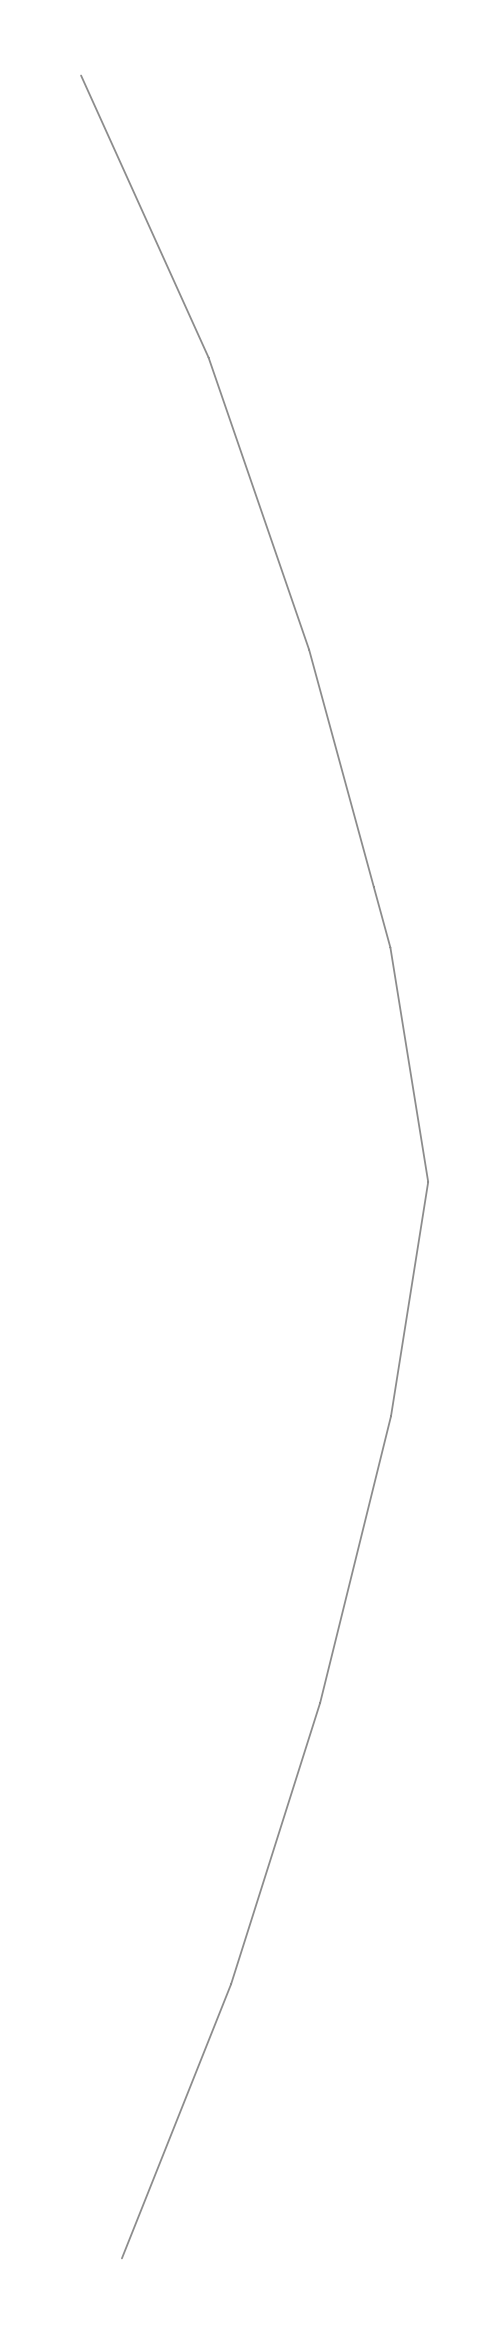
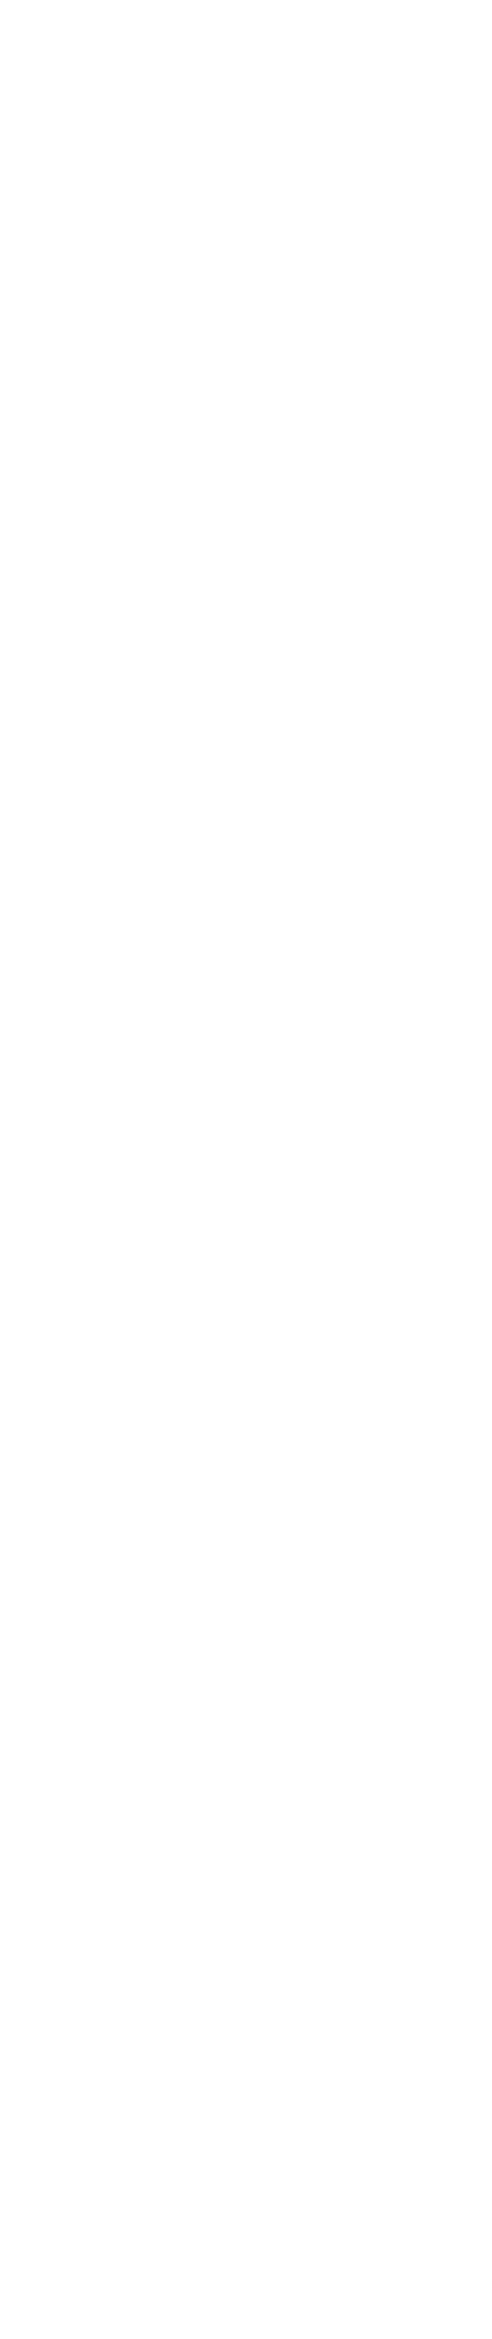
line: (81, 75) (208, 357) (309, 649) (390, 947) (428, 1181) (390, 1416) (320, 1702) (231, 1984) (121, 2258) -> none

